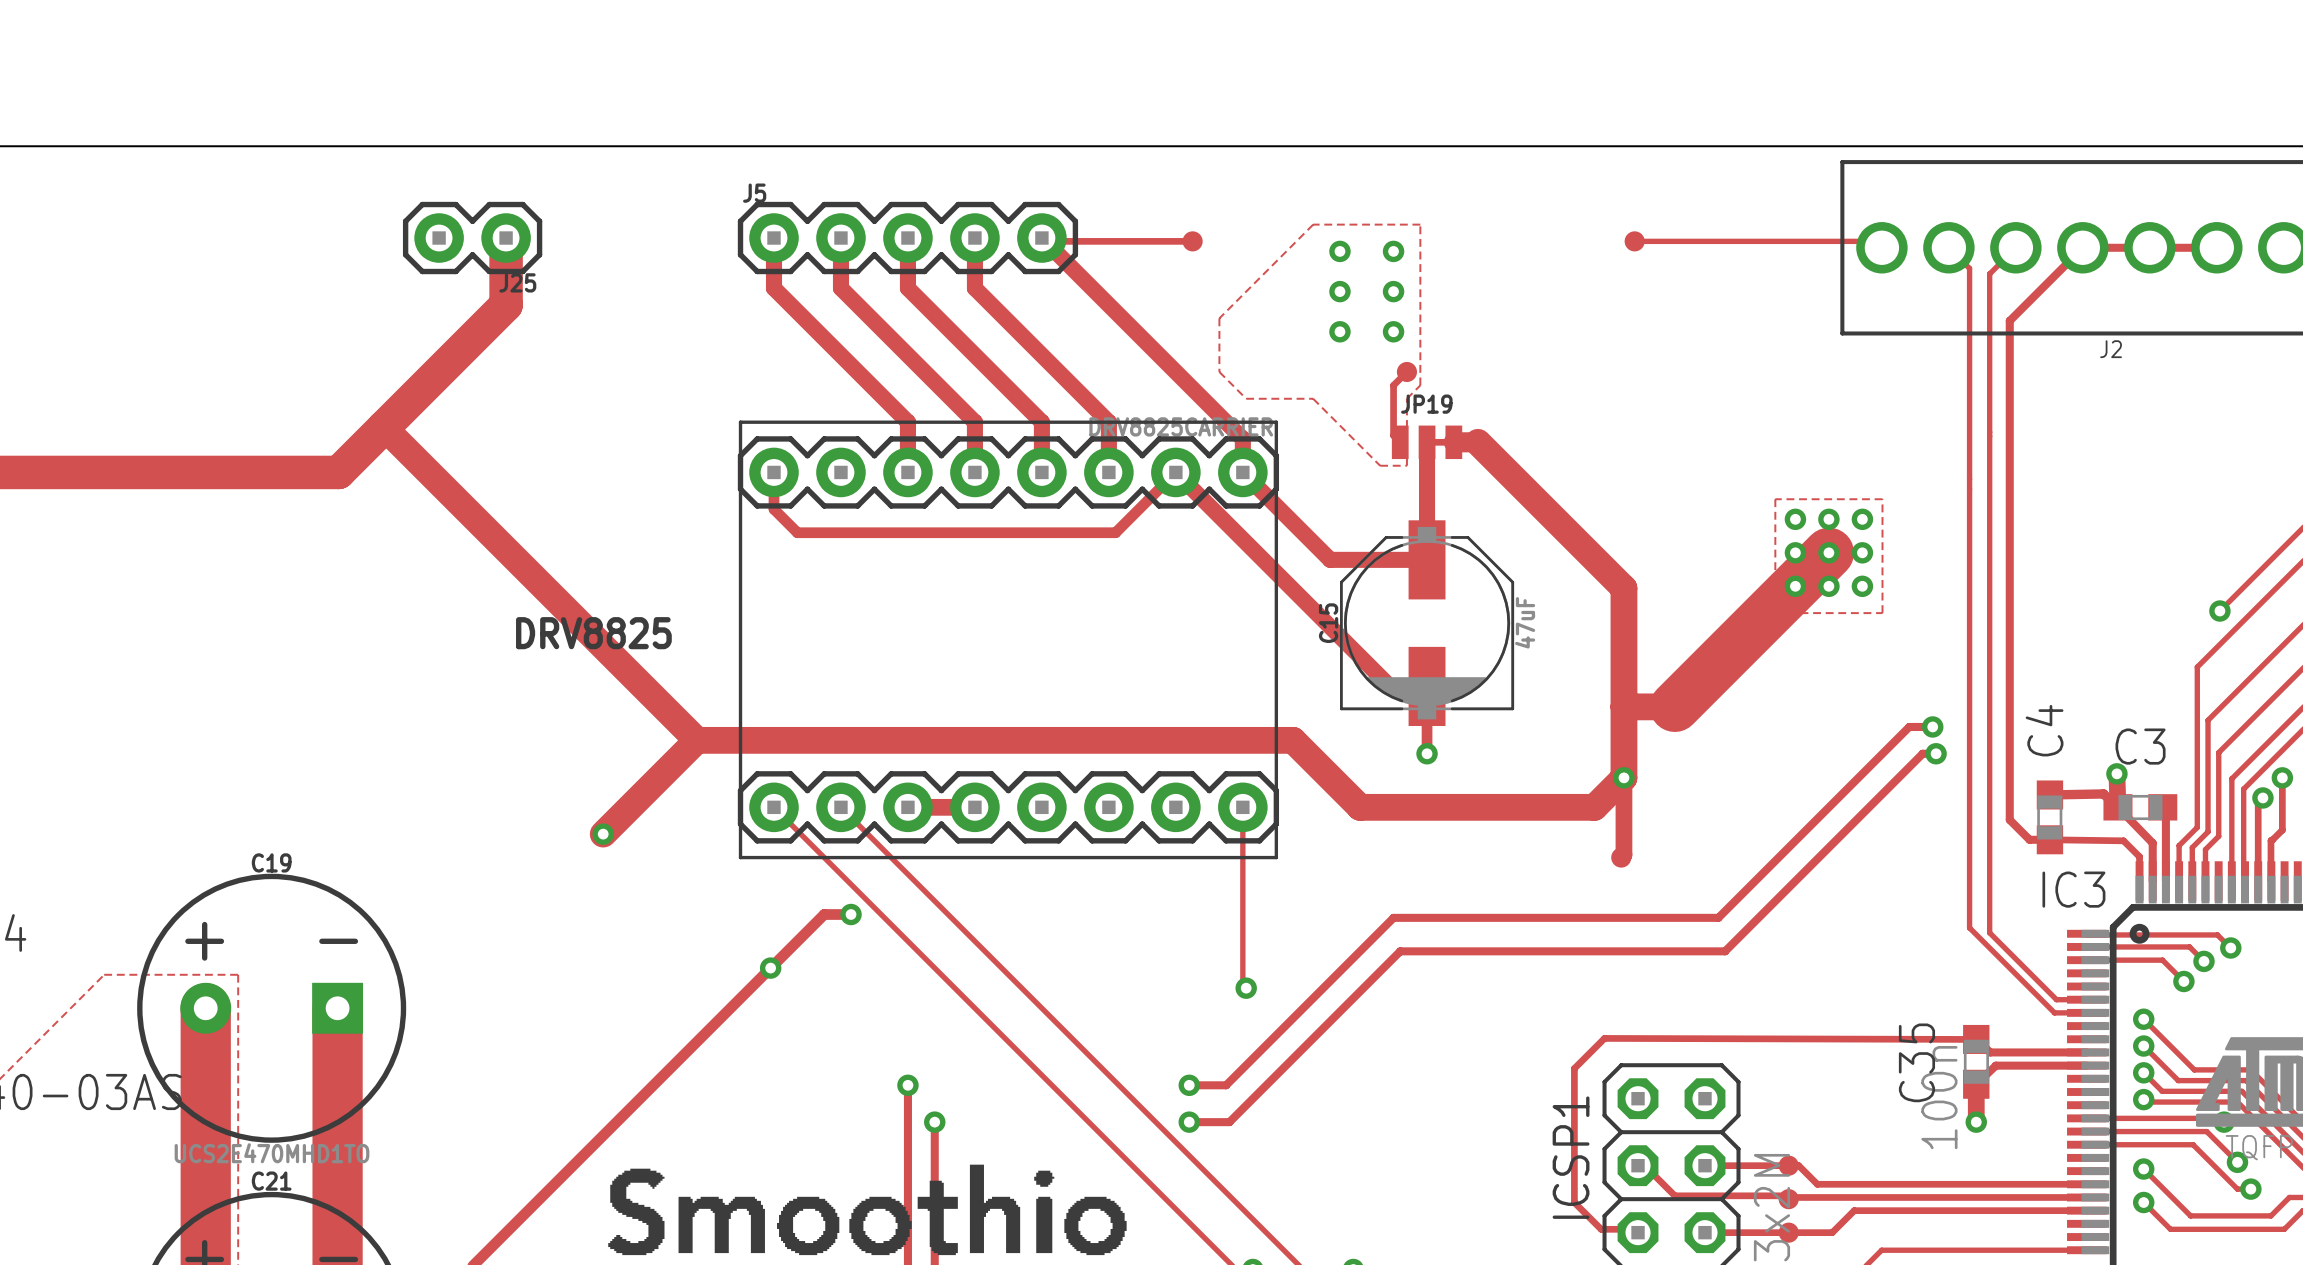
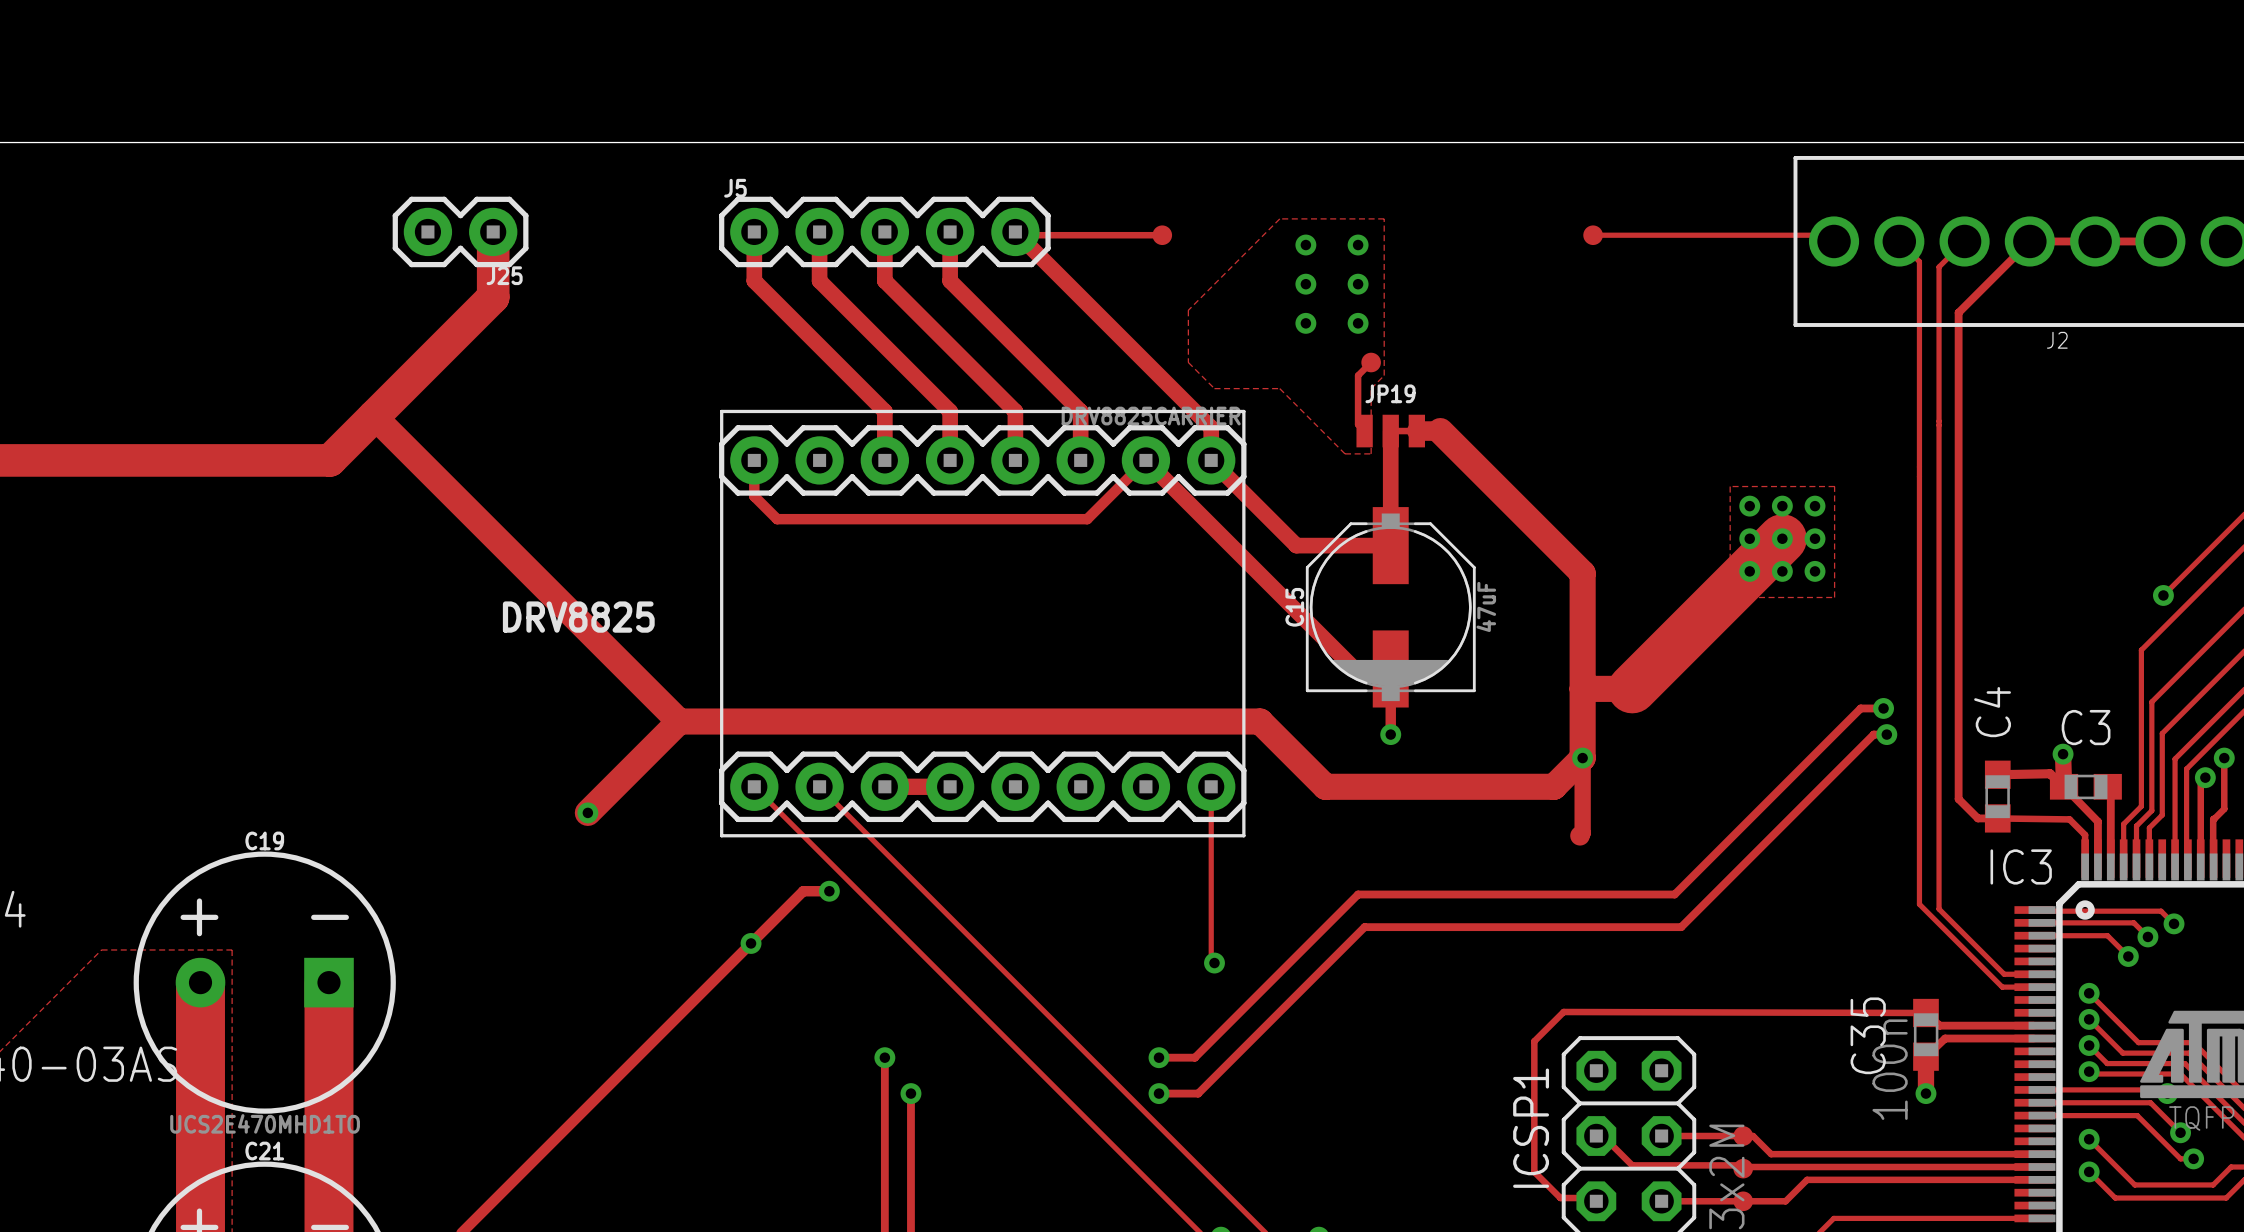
drawing: [608, 1164, 1127, 1256] -> none

